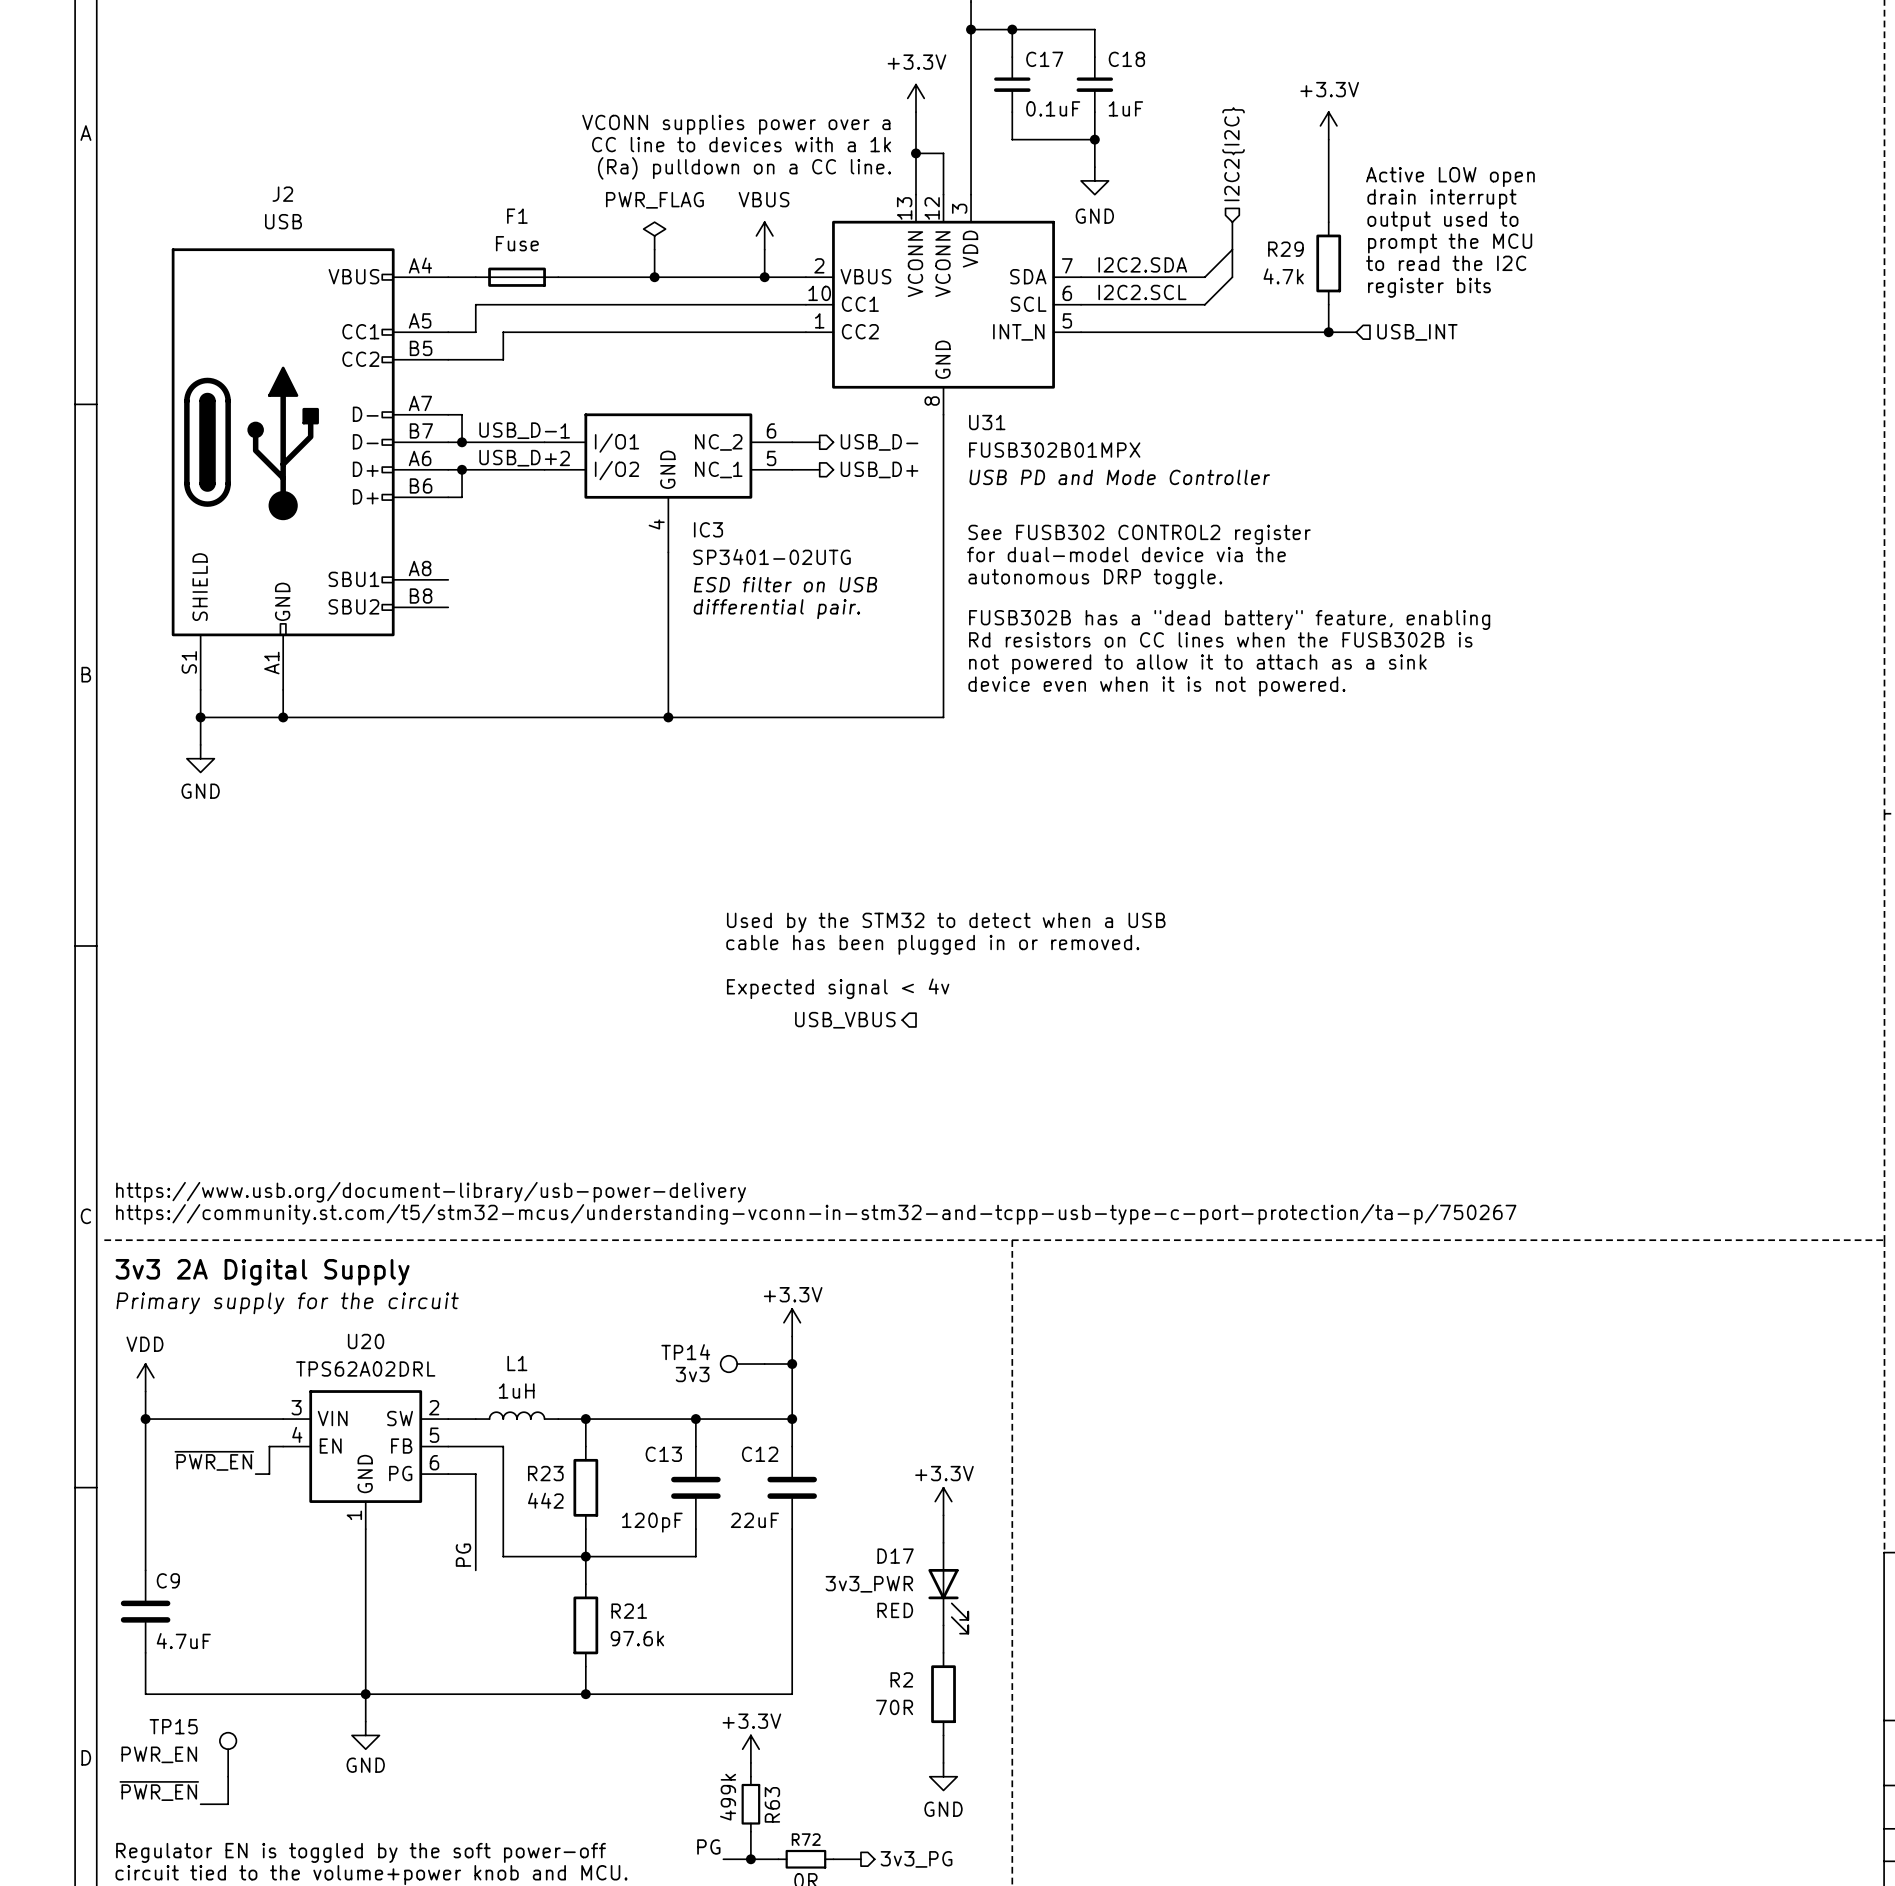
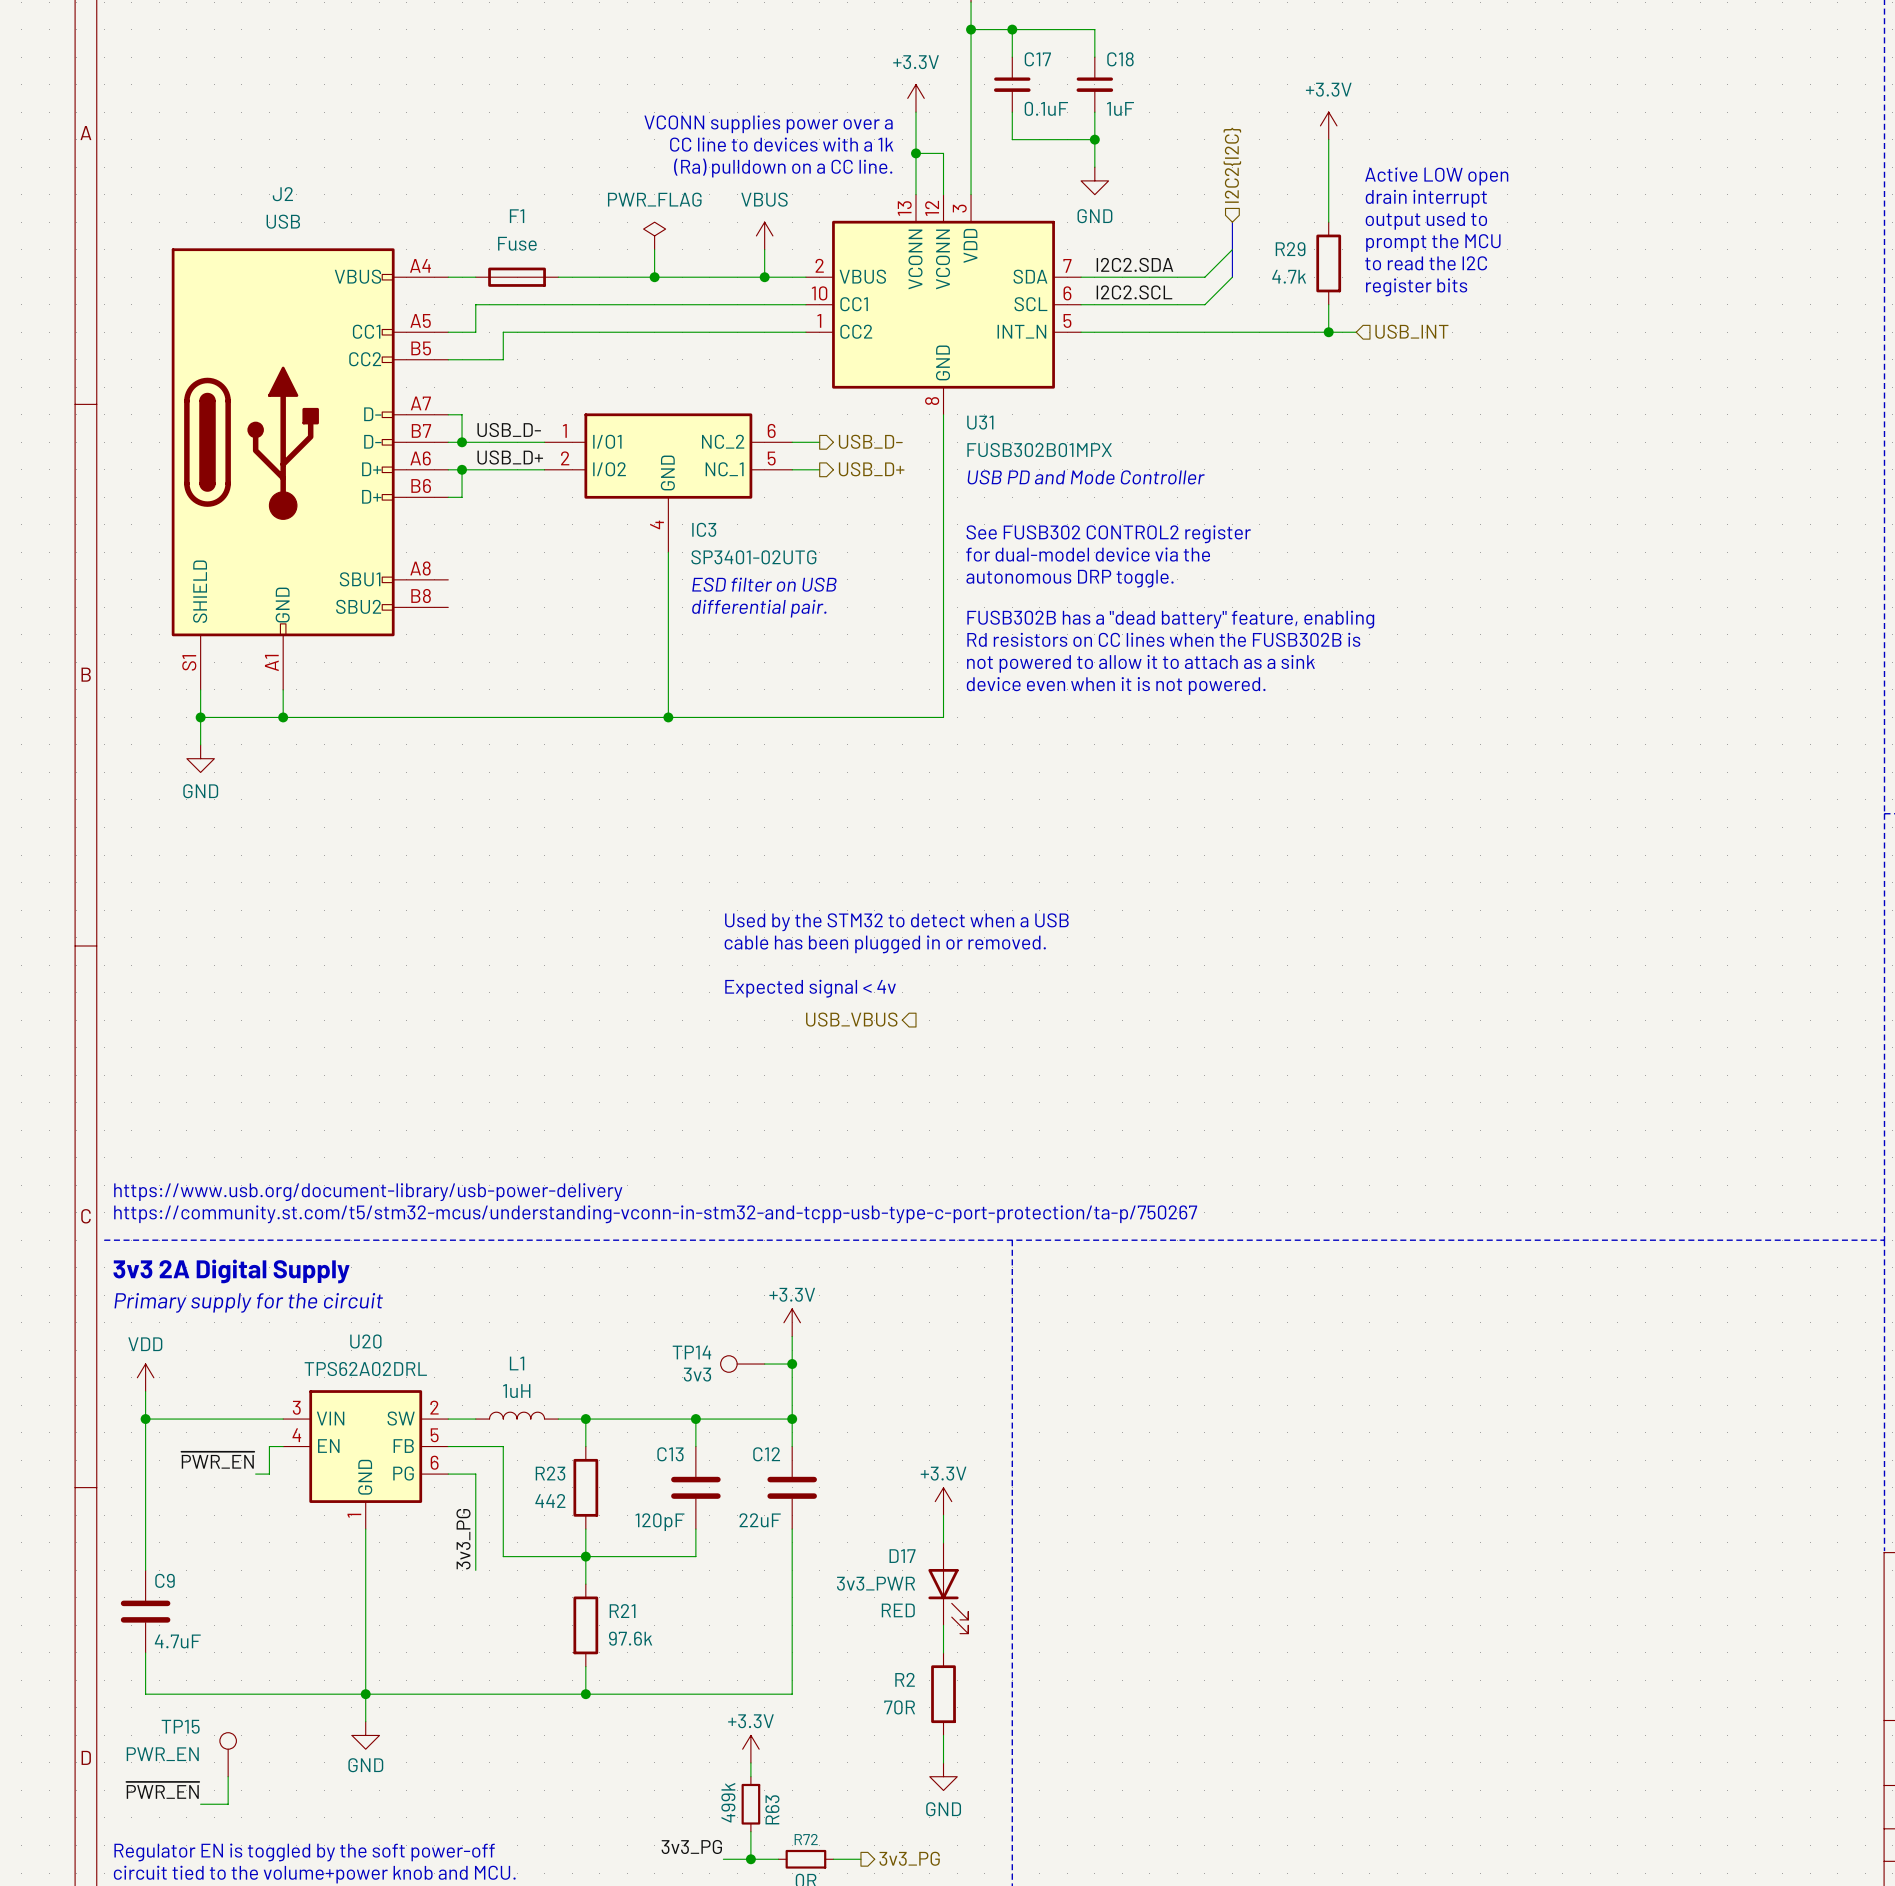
label: PG (463, 1555) -> 3v3_PG (463, 1539)
label: PG (708, 1846) -> 3v3_PG (691, 1846)

